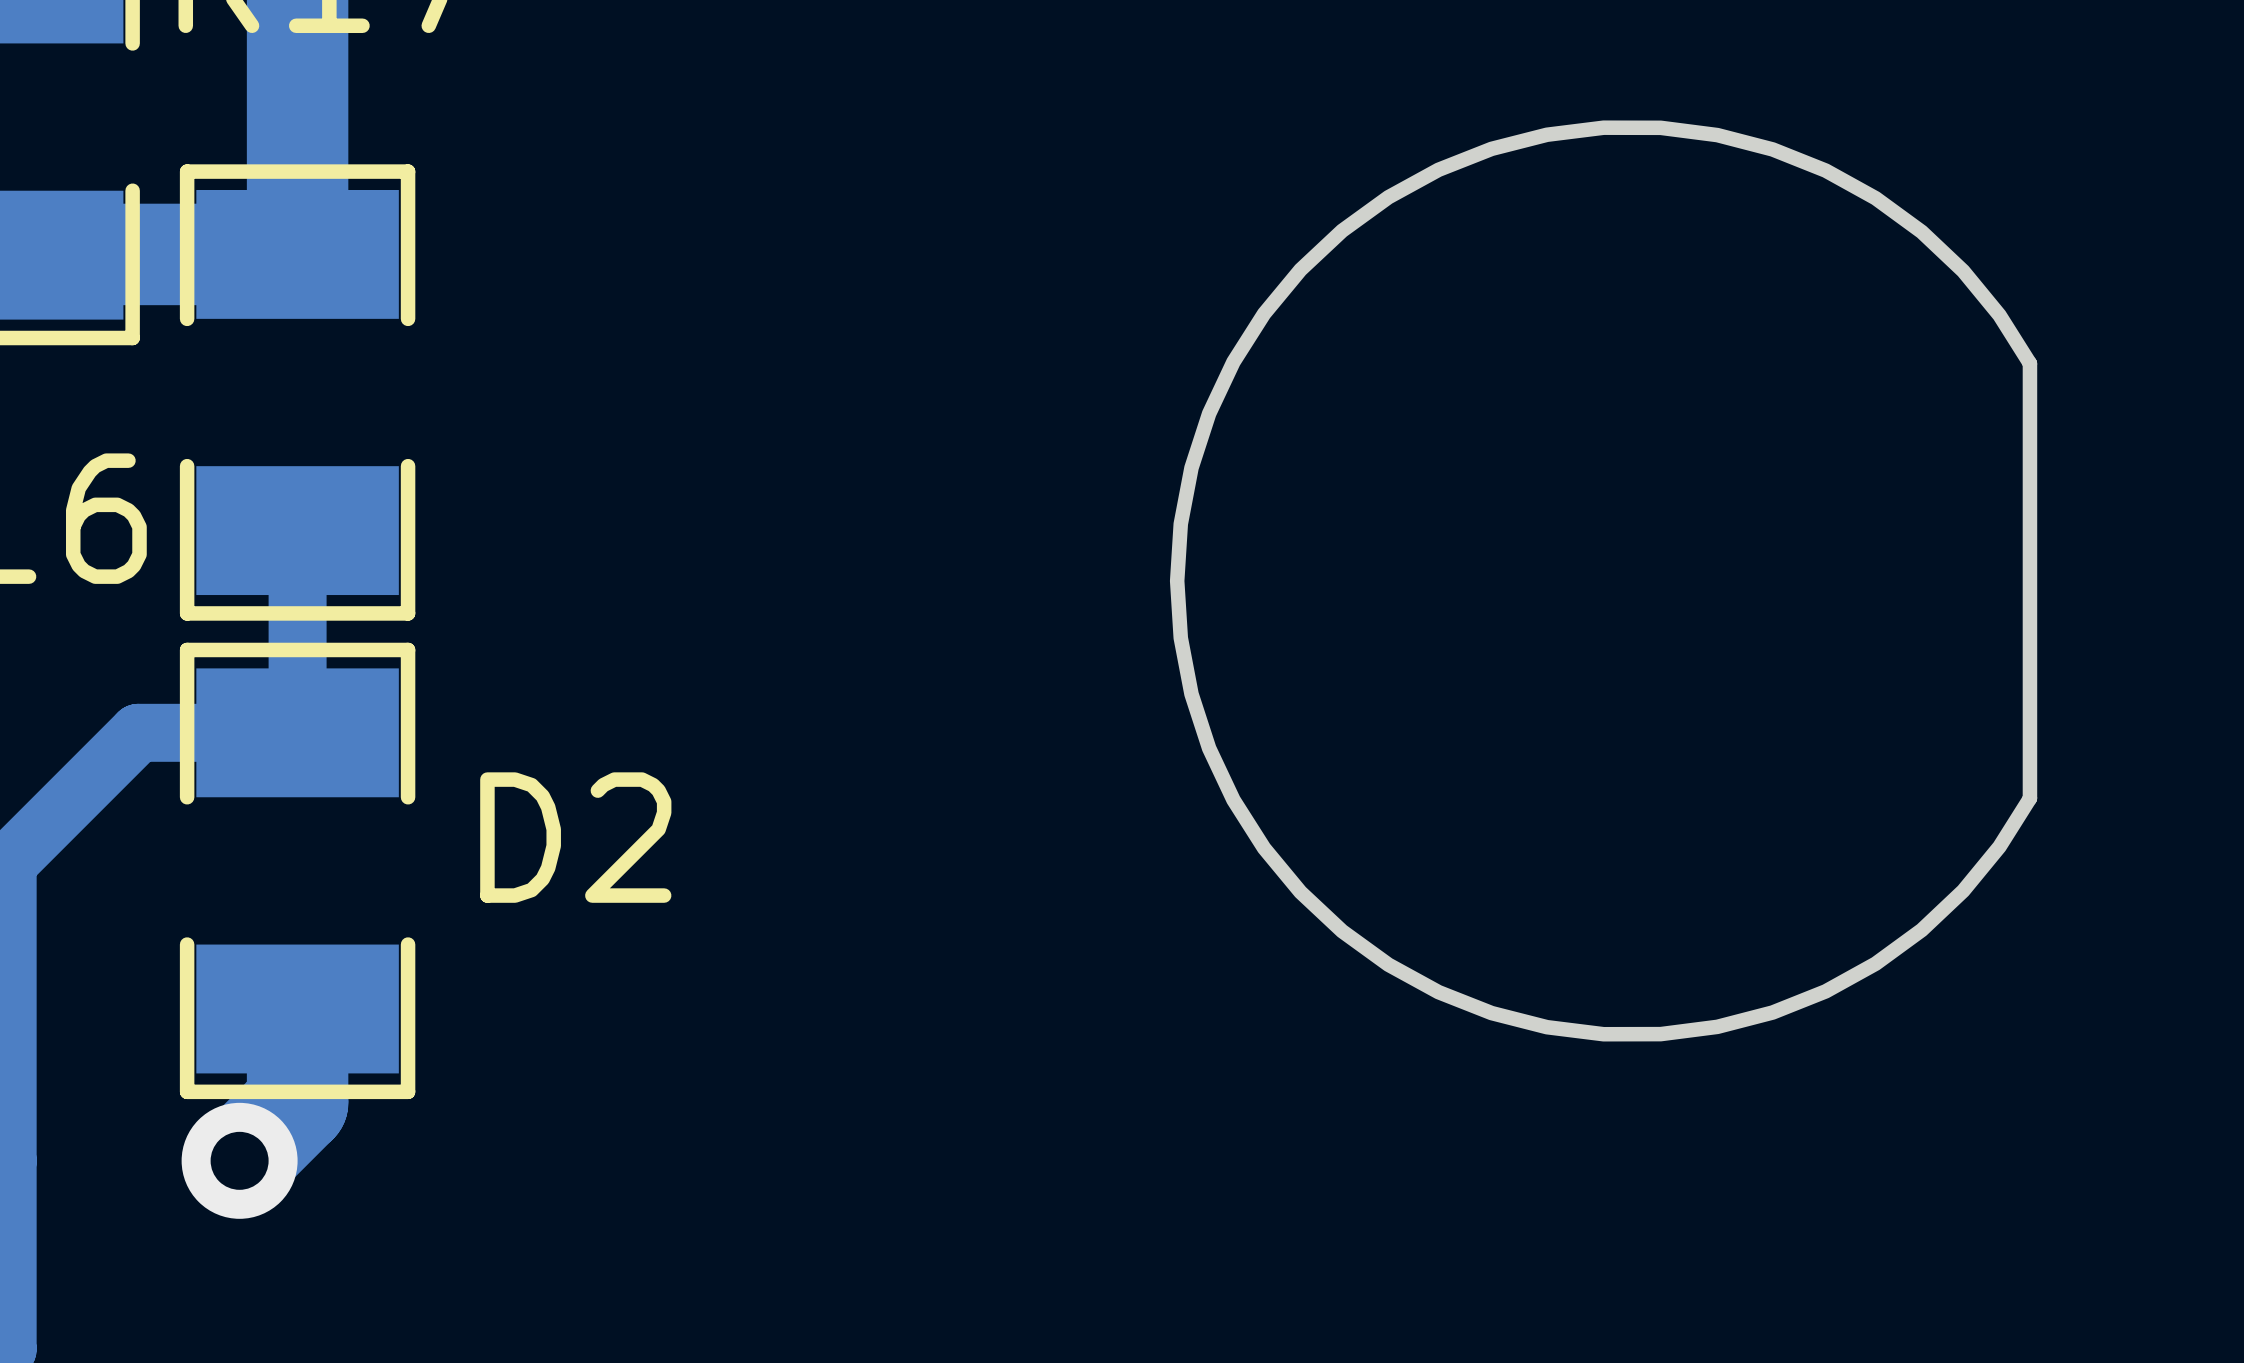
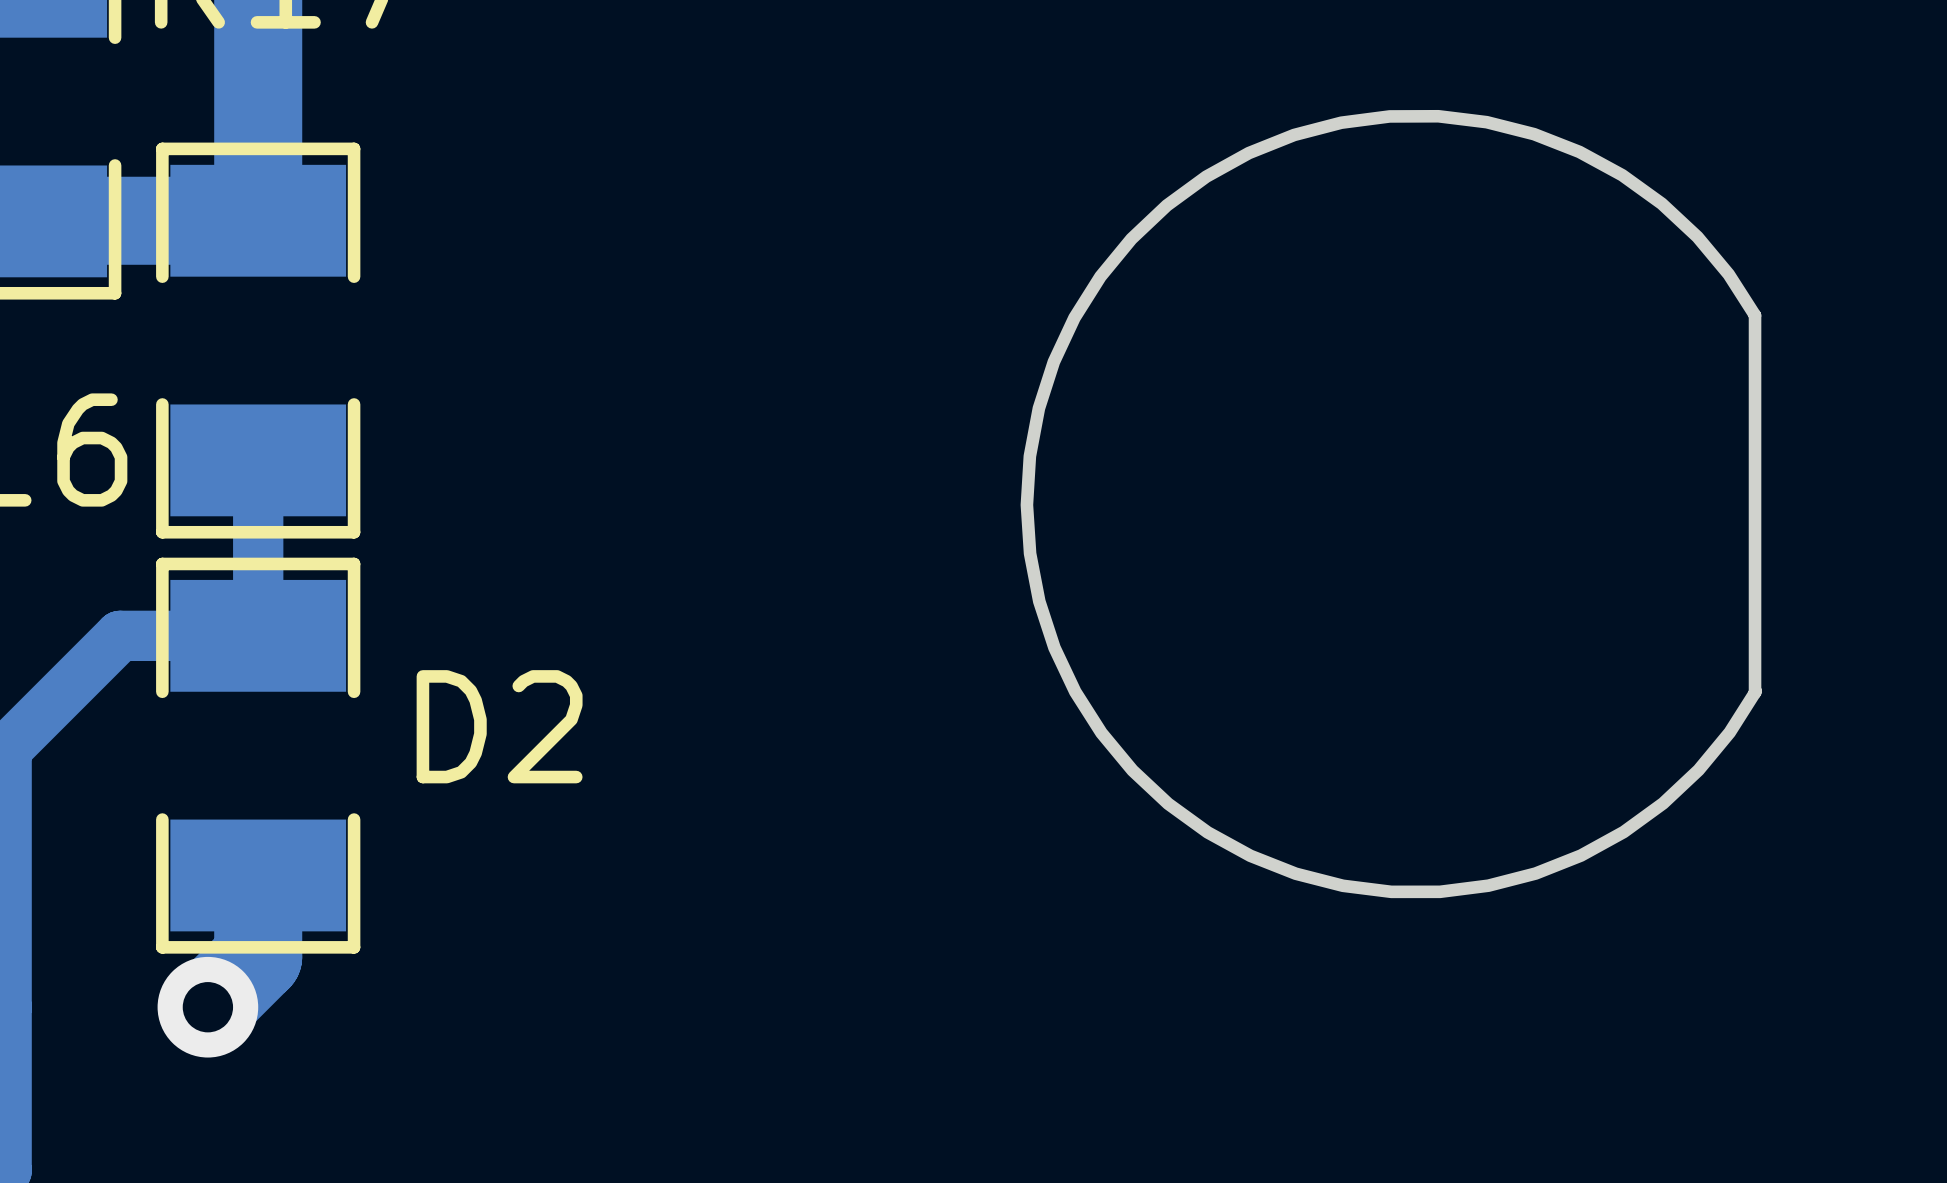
part footprint: [1169, 120, 2038, 1042] -> [1020, 109, 1763, 899]

